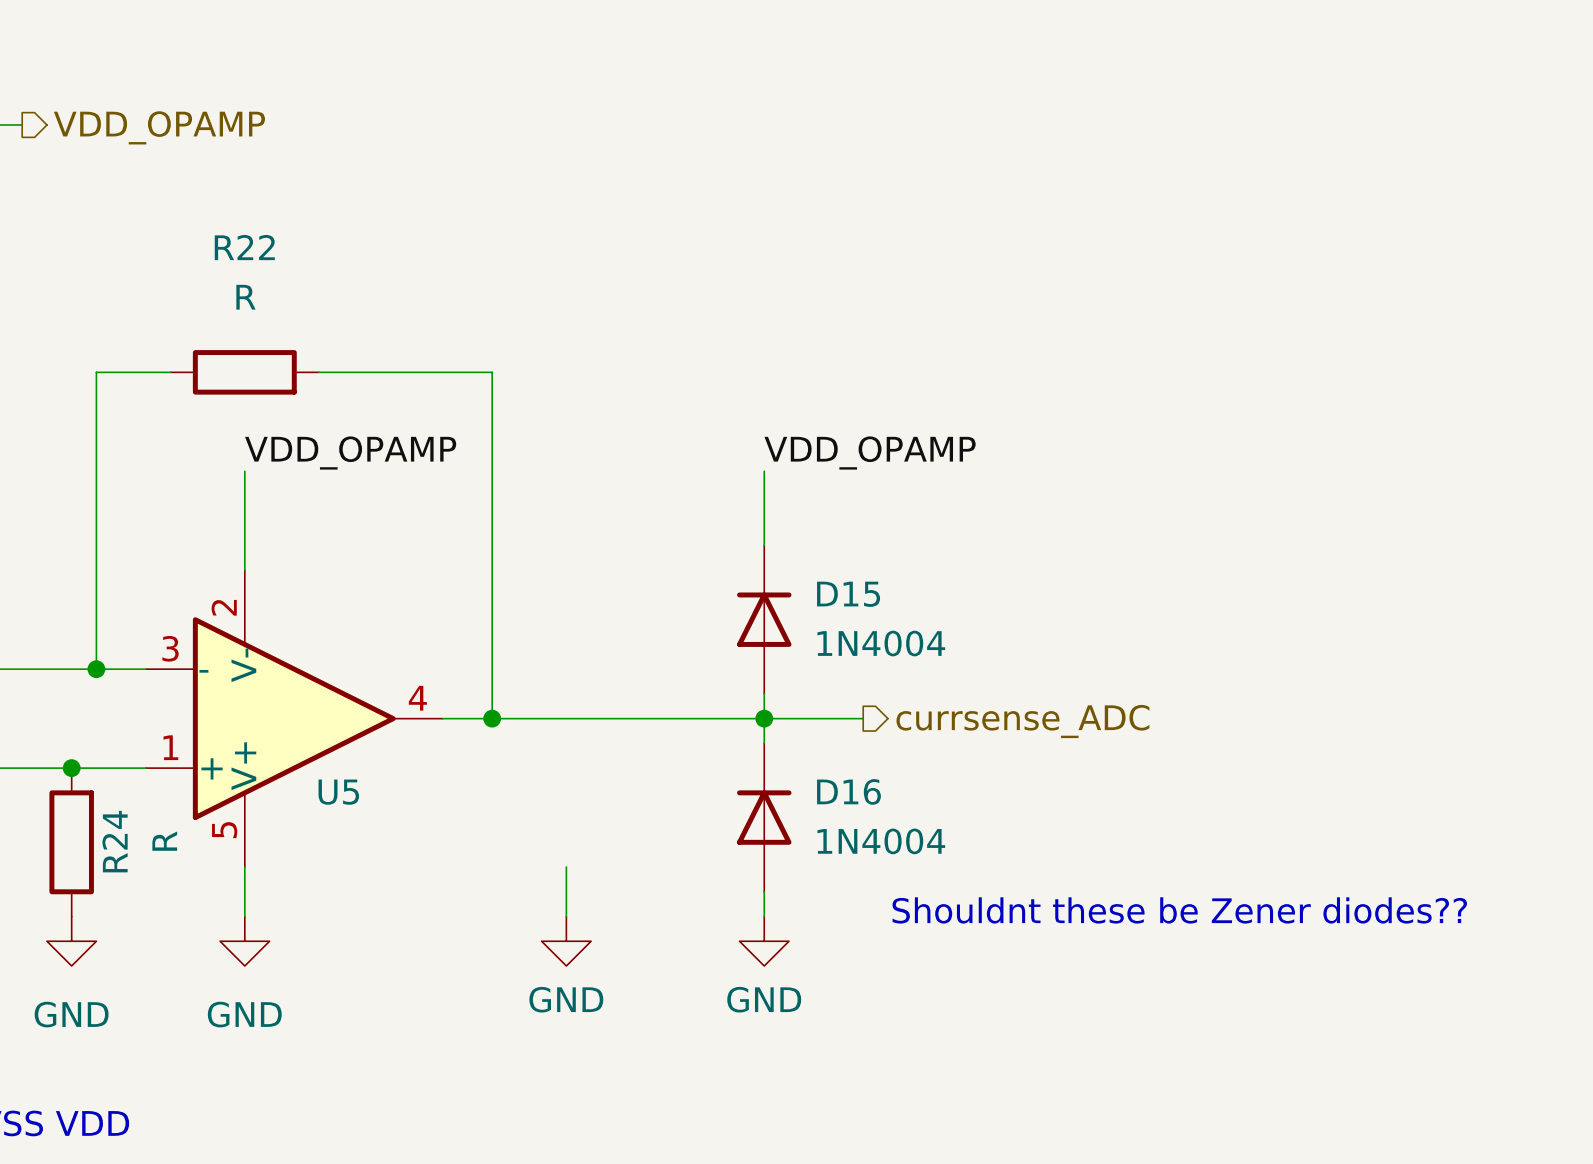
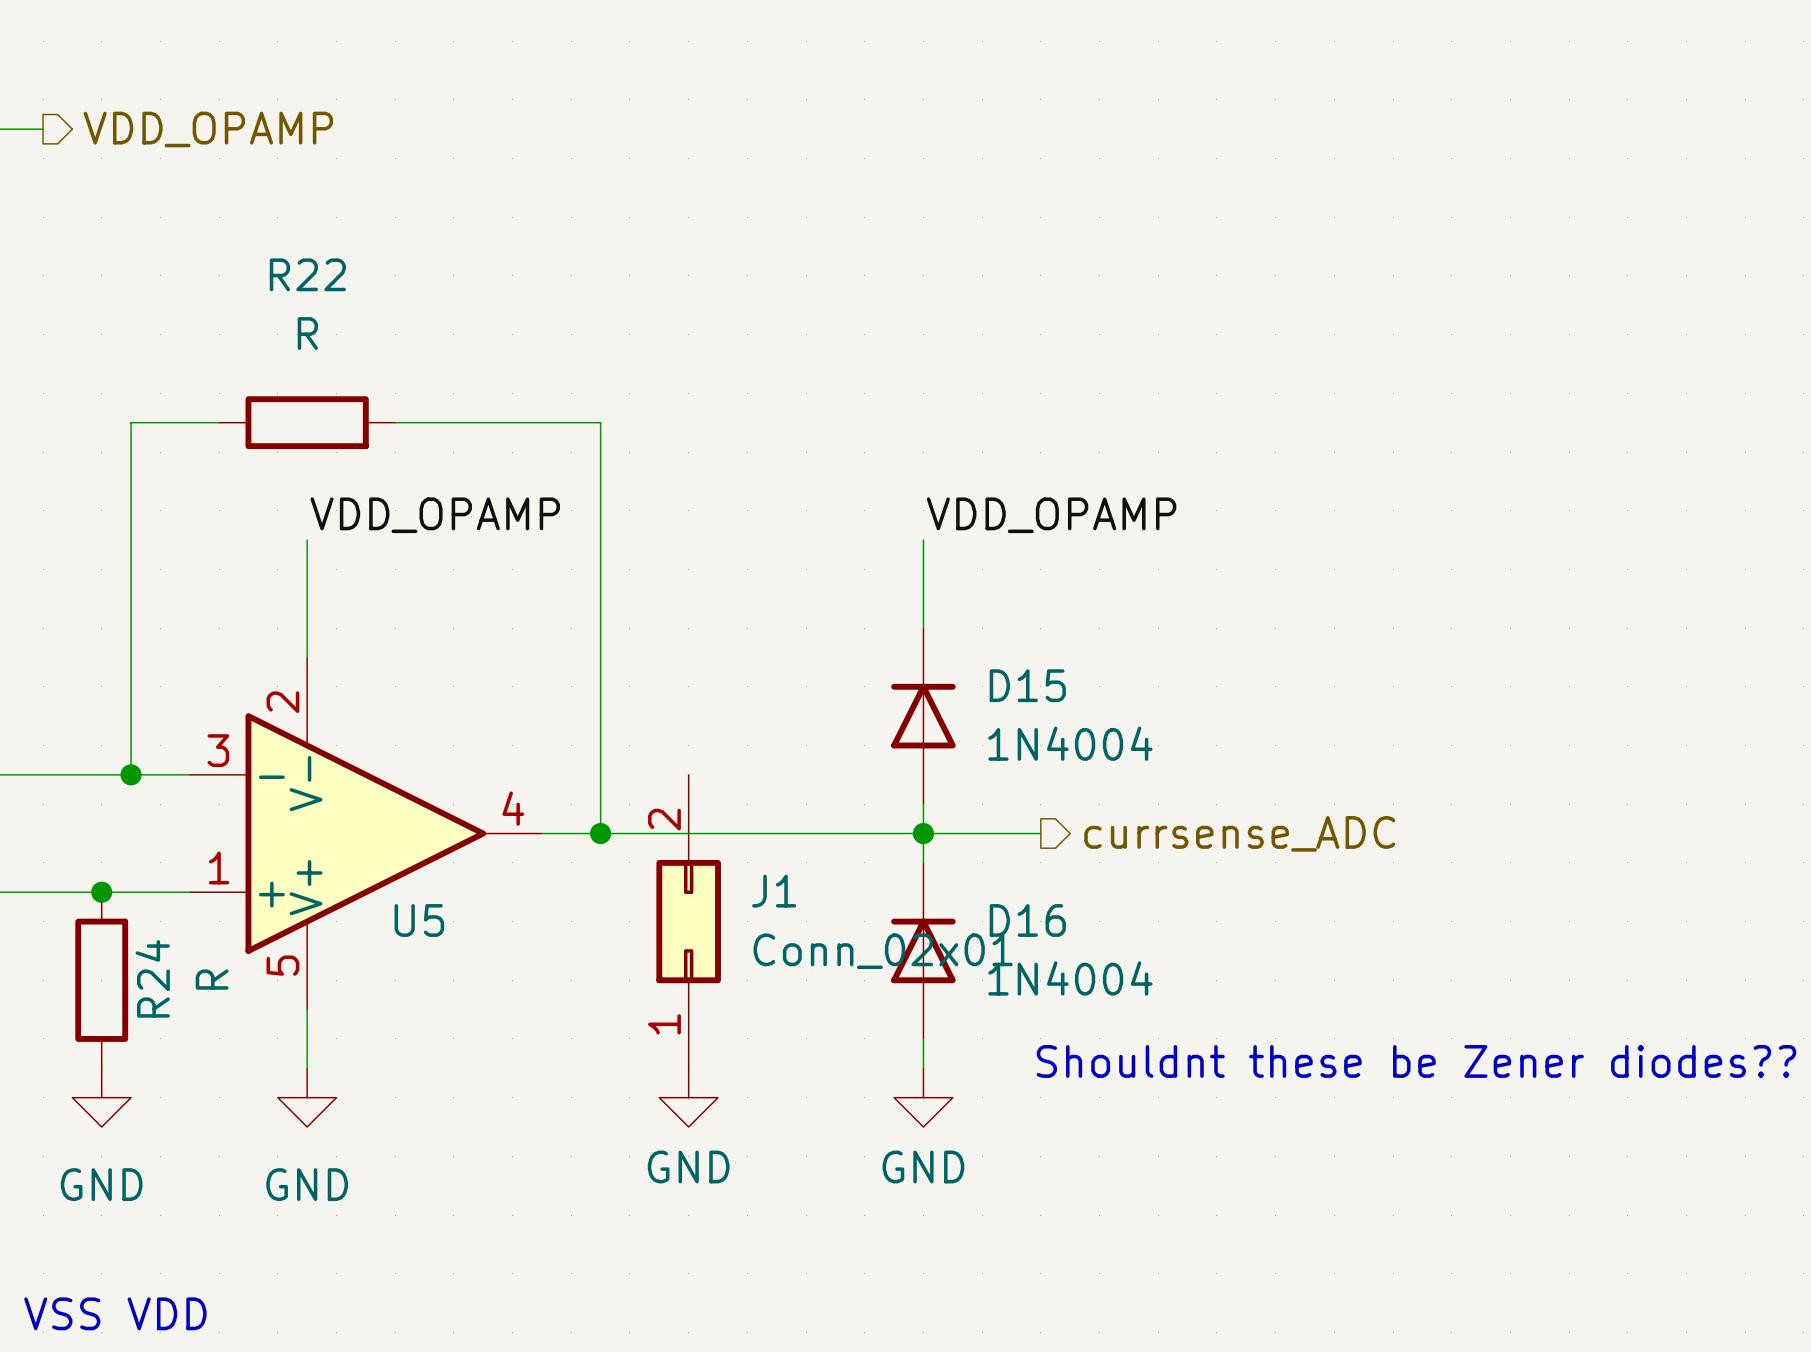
J1: none -> Conn_02x01 (688, 921)

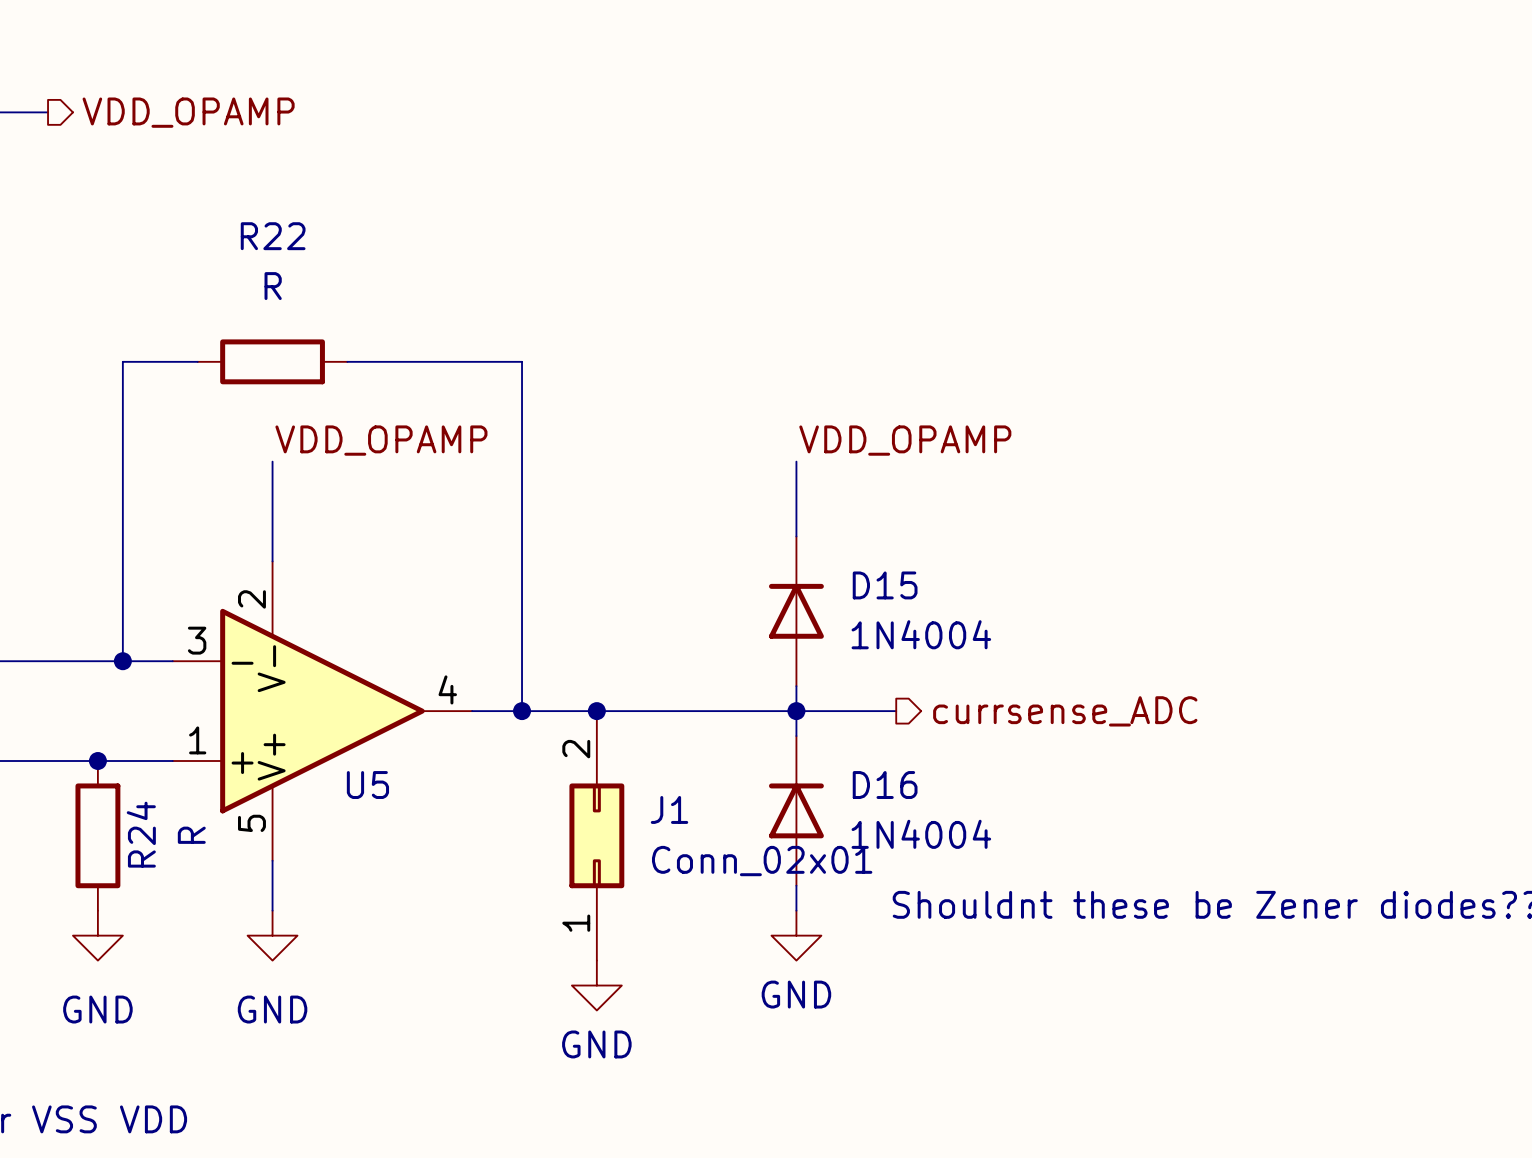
junction: none -> (596, 711)
J1 position: (688, 921) -> (596, 835)
power symbol position: GND (688, 1097) -> GND (596, 985)

